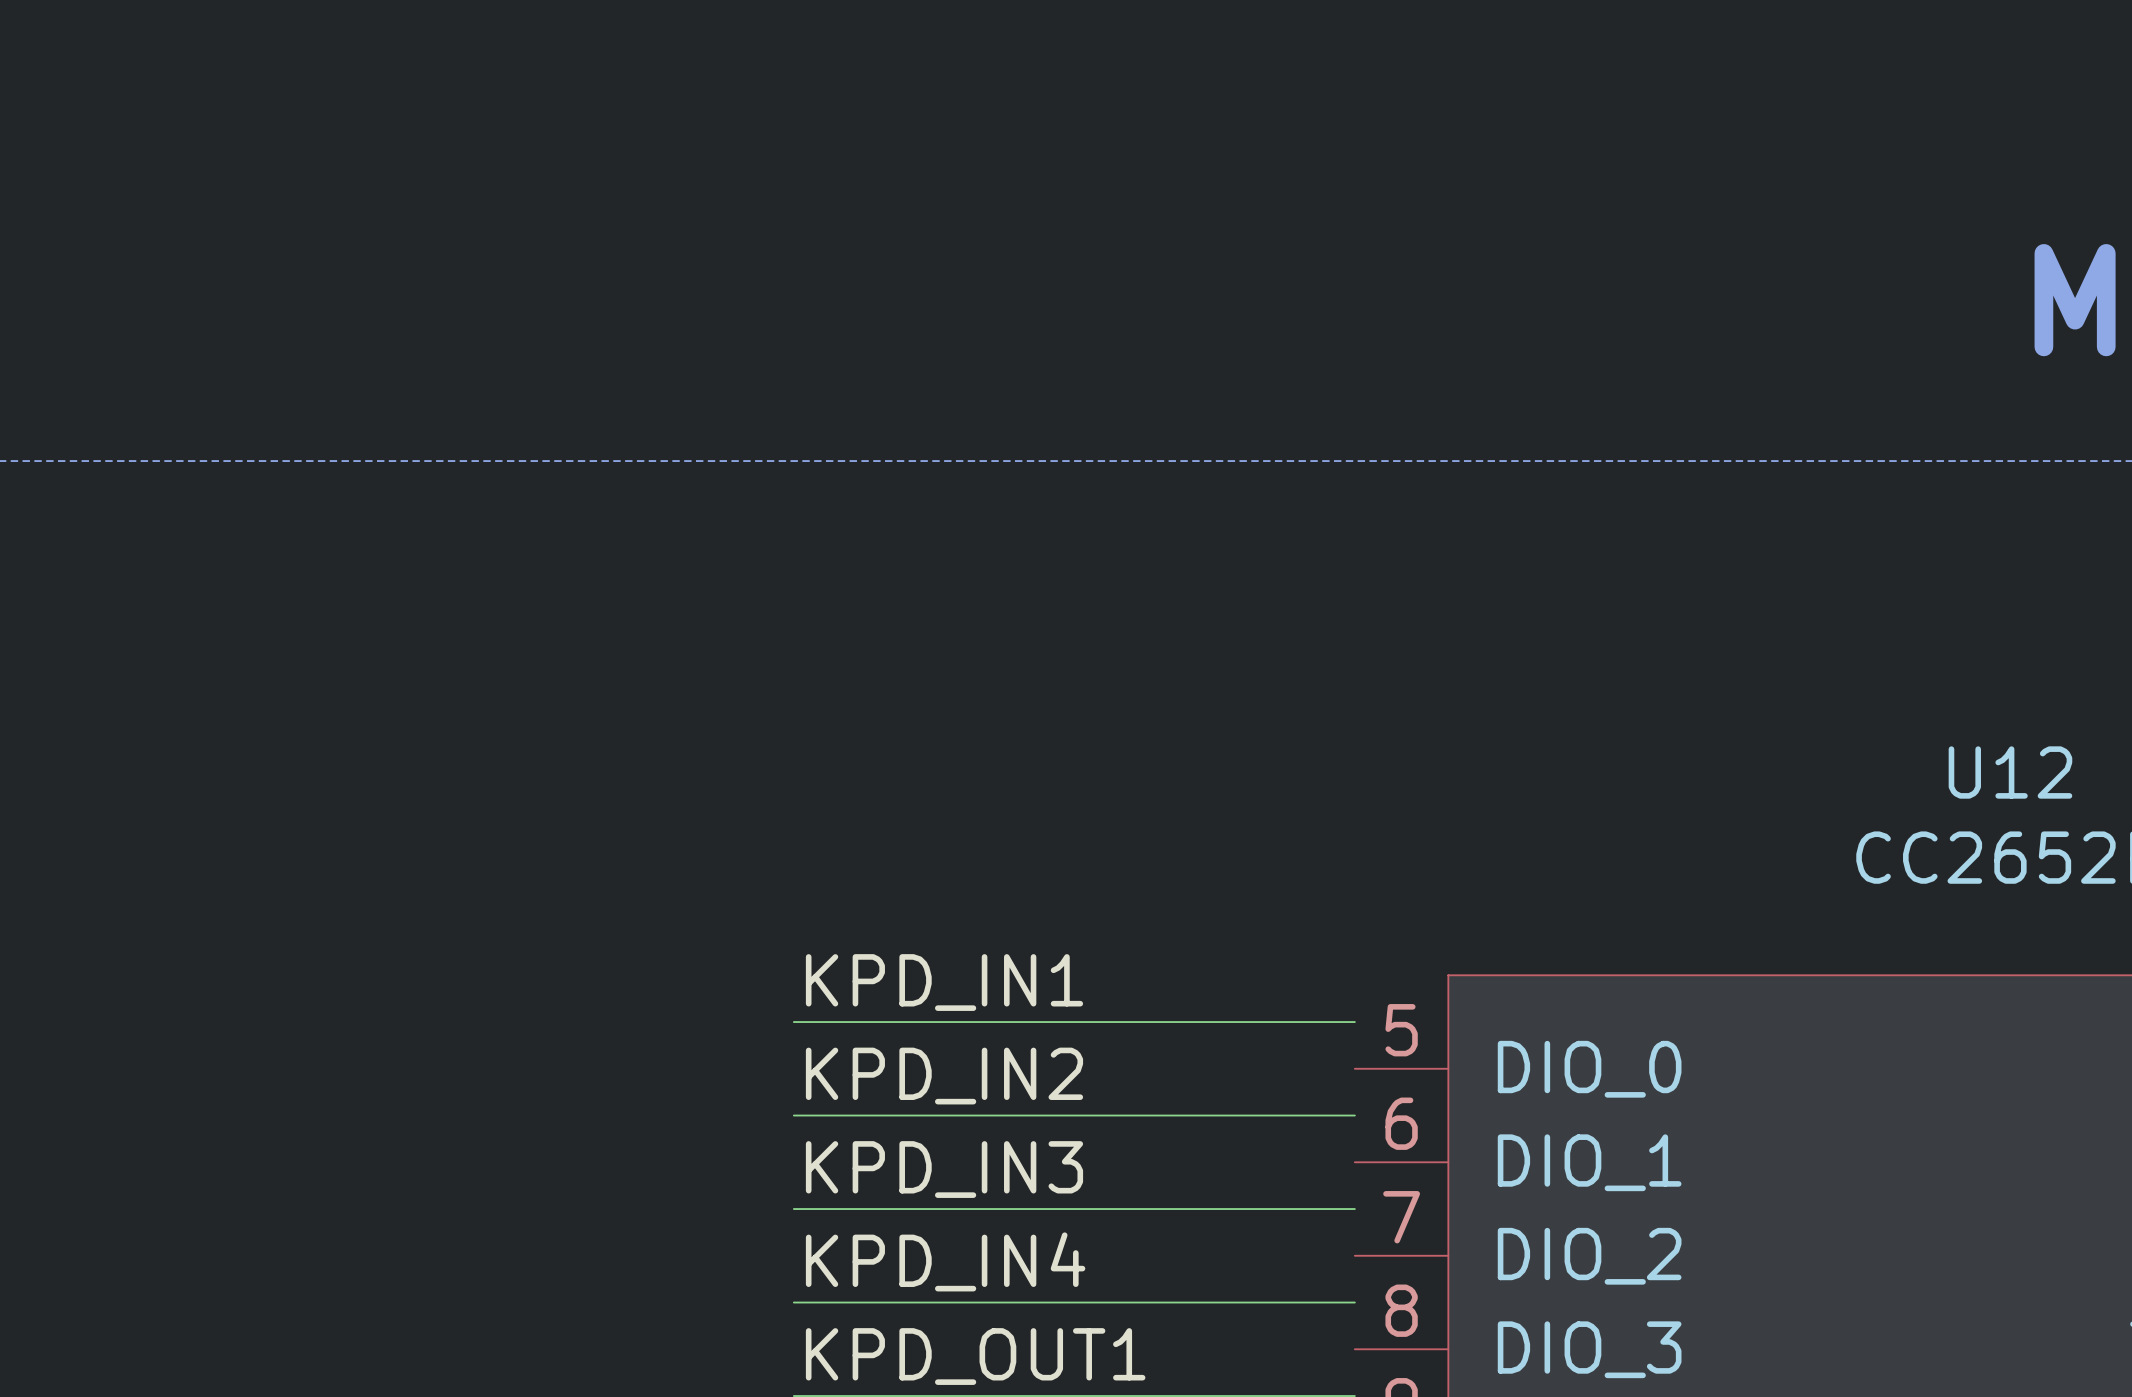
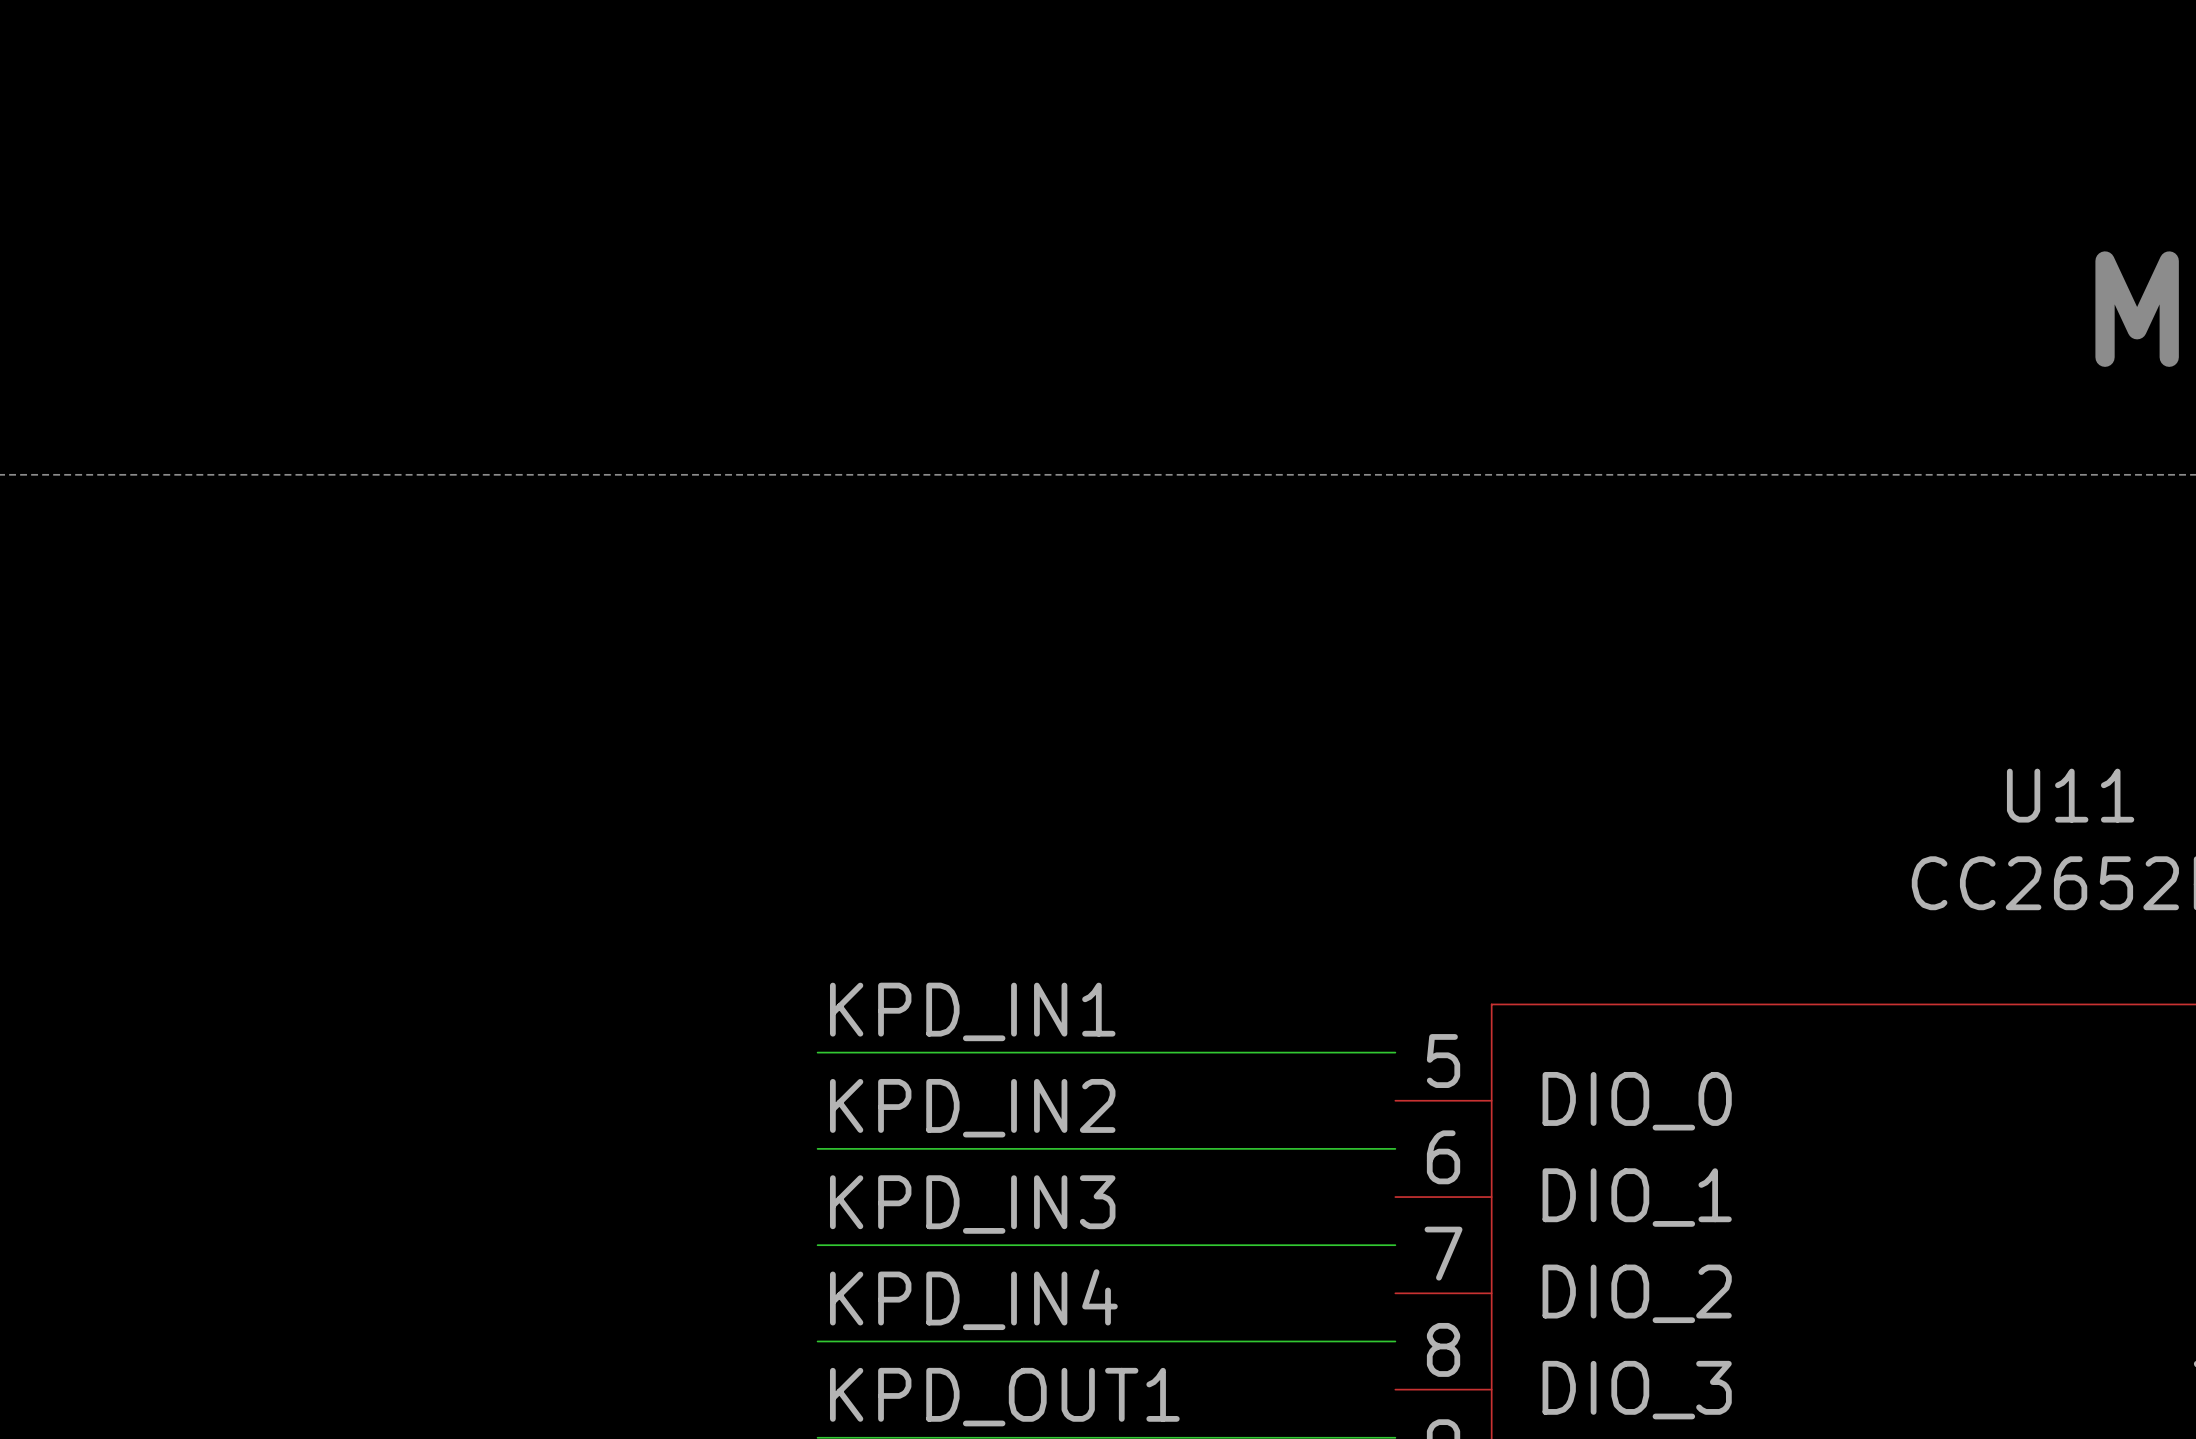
U12 name: U12 (2010, 772) -> U11 (2070, 795)

